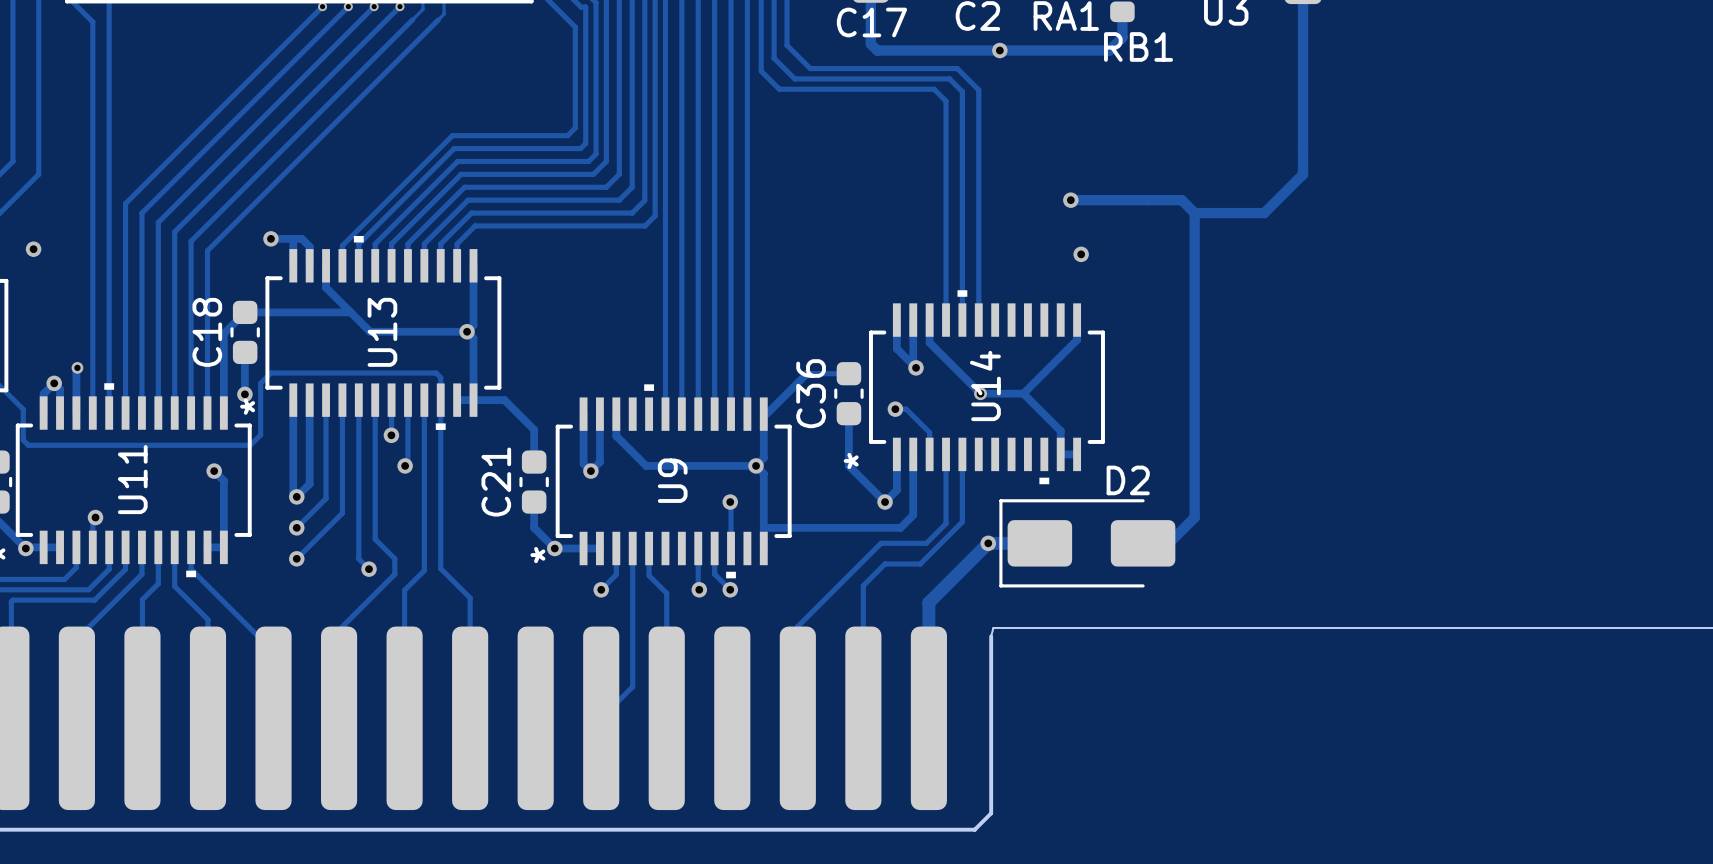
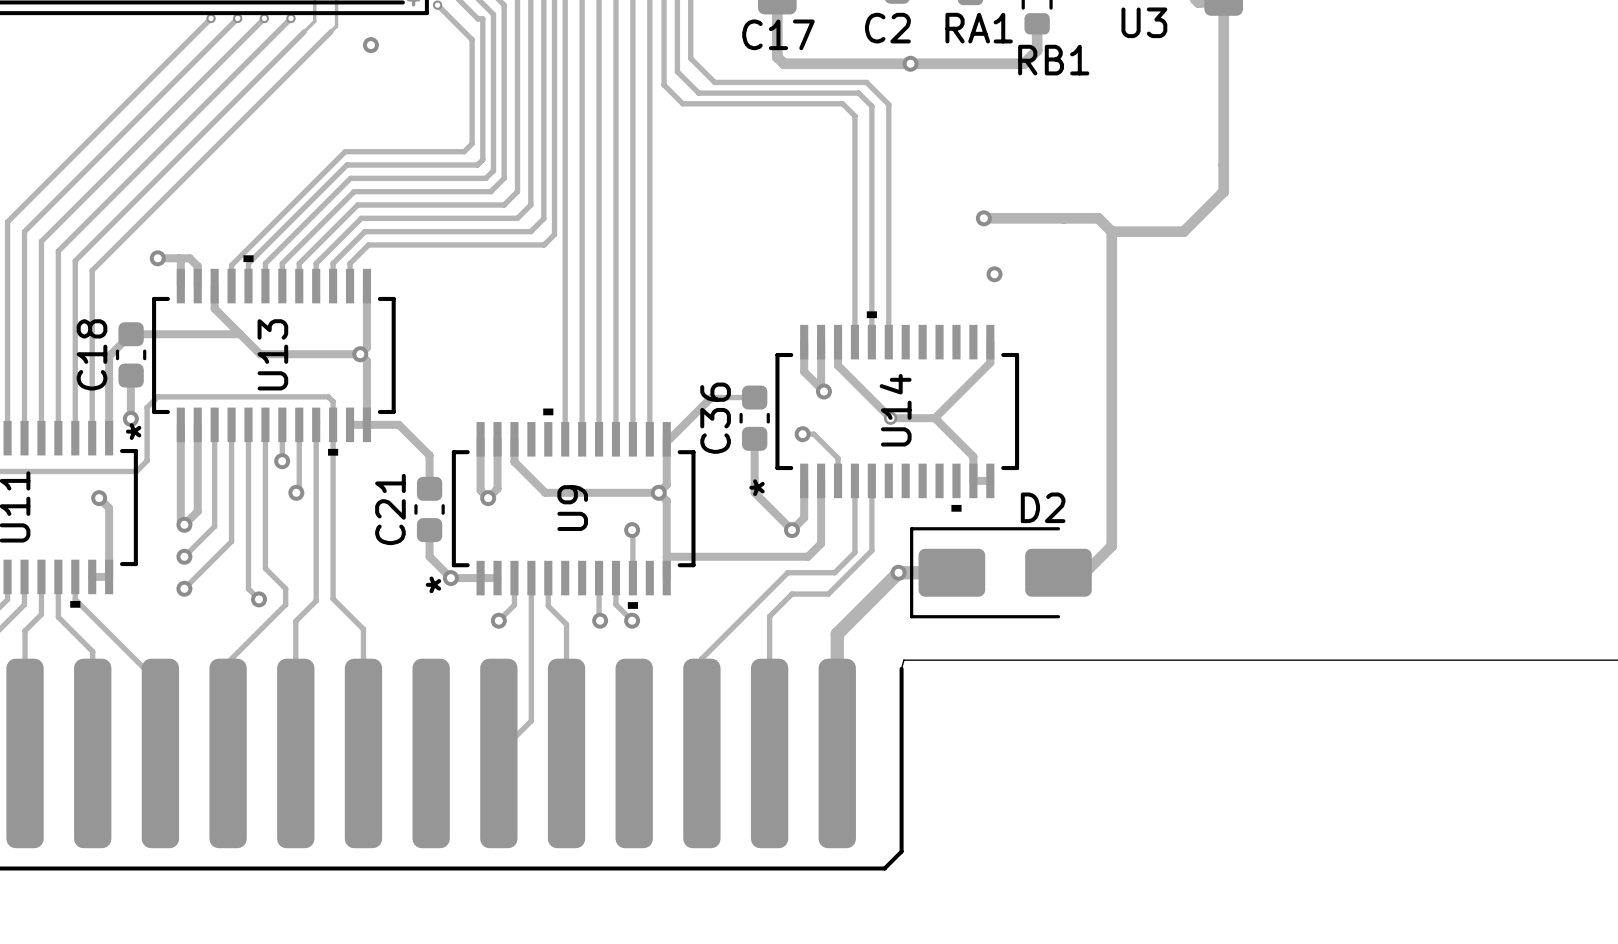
via: none -> (370, 45)

